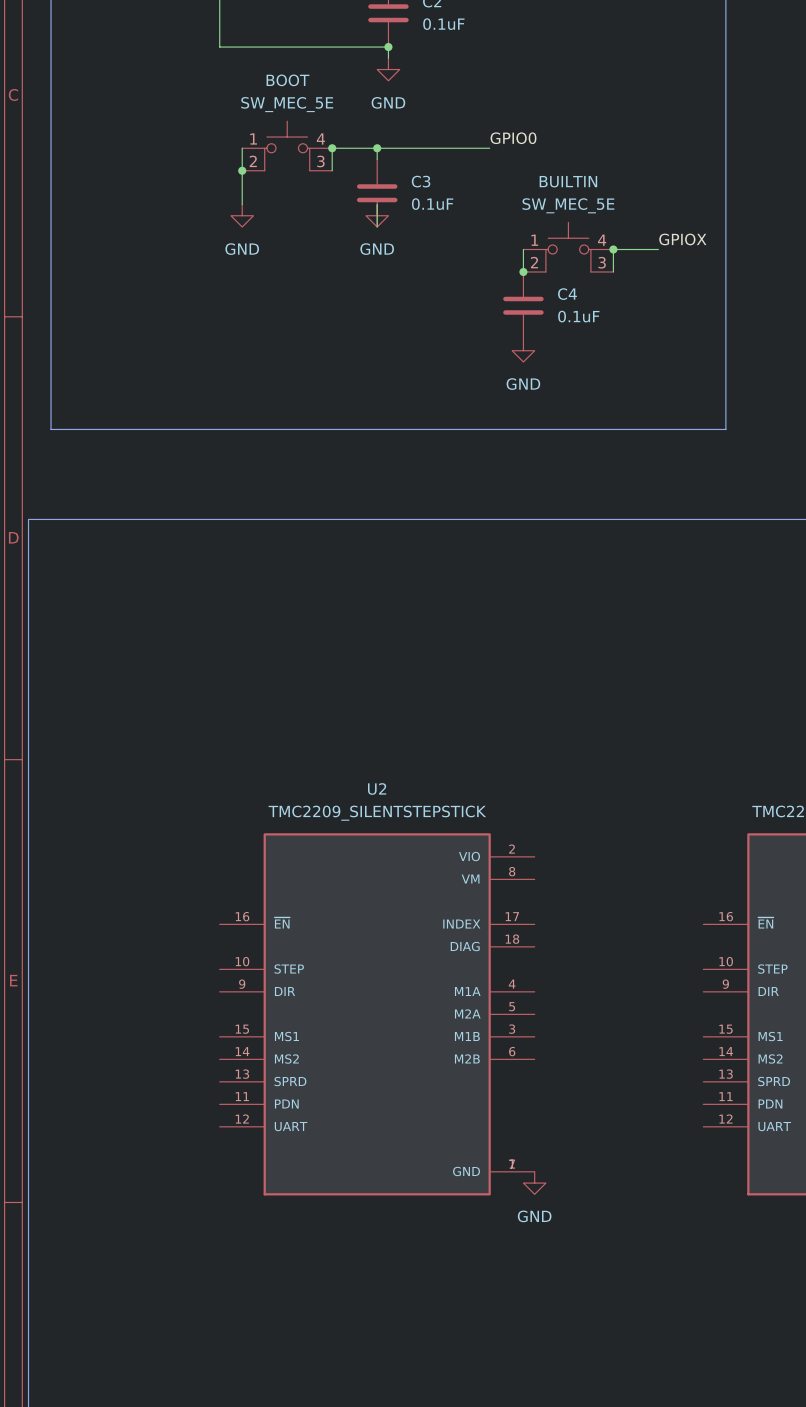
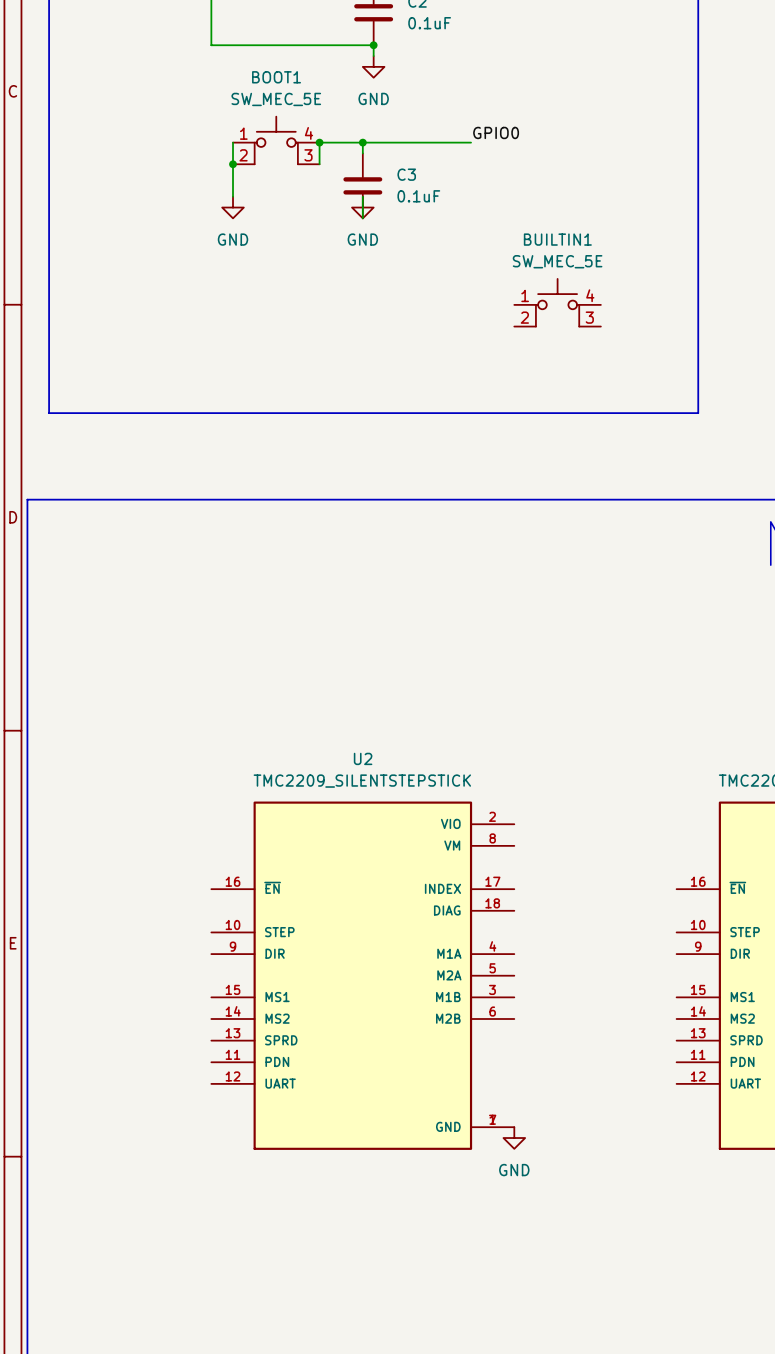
BOOT name: BOOT (288, 80) -> BOOT1 (276, 77)
label: GPIOX (682, 239) -> none
BUILTIN: SW_MEC_5E (568, 247) -> none
wire: (523, 249) (523, 271) -> none
junction: (613, 249) -> none
wire: (658, 249) (613, 249) (613, 271) -> none
junction: (523, 271) -> none
C4: 0.1uF (523, 305) -> none
BUILTIN1: none -> SW_MEC_5E (557, 302)
power symbol: GND (523, 350) -> none

